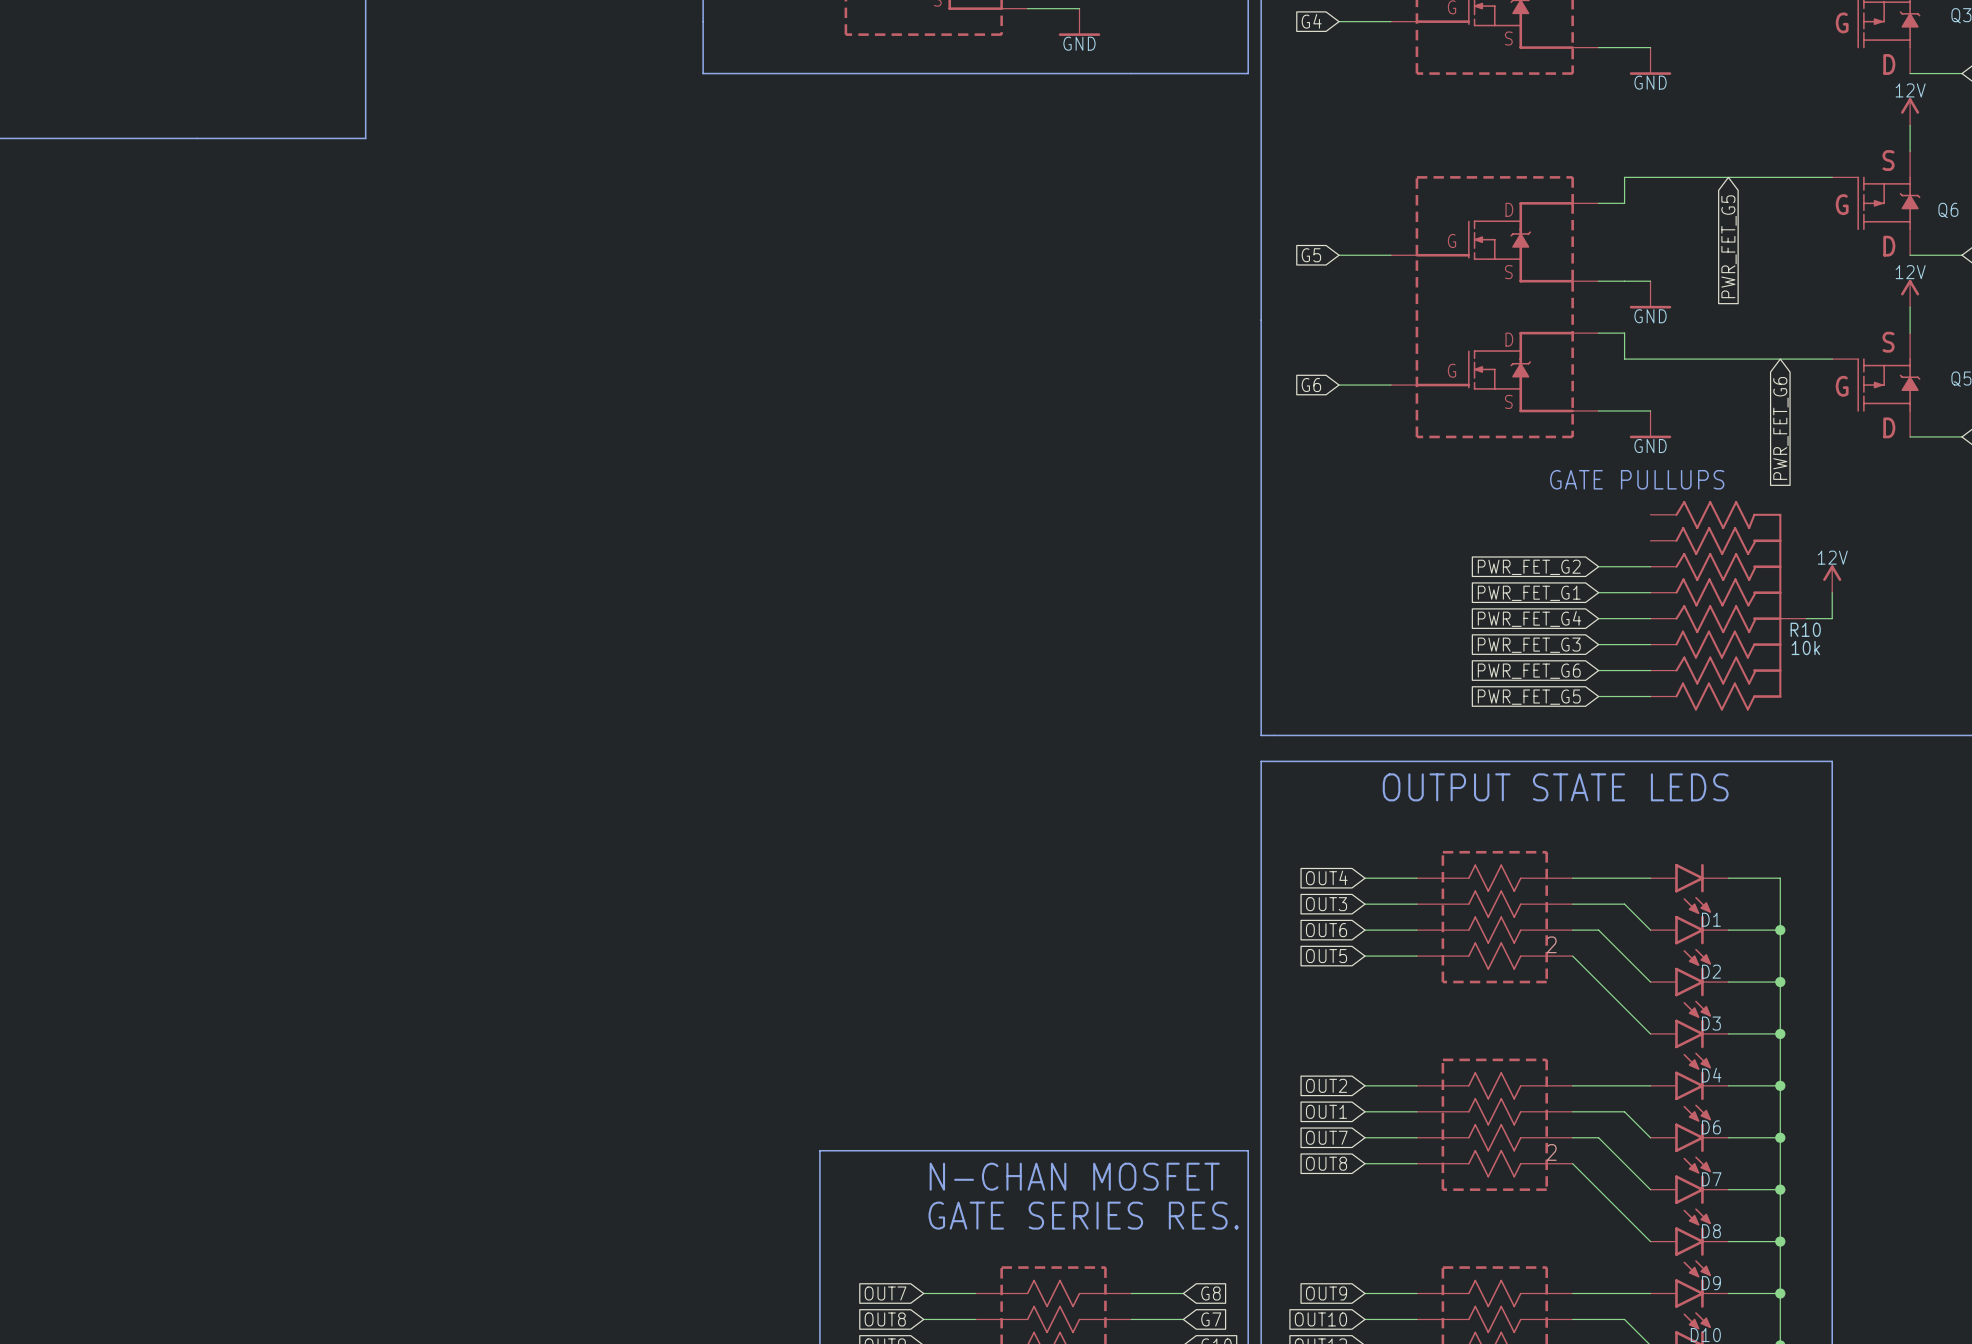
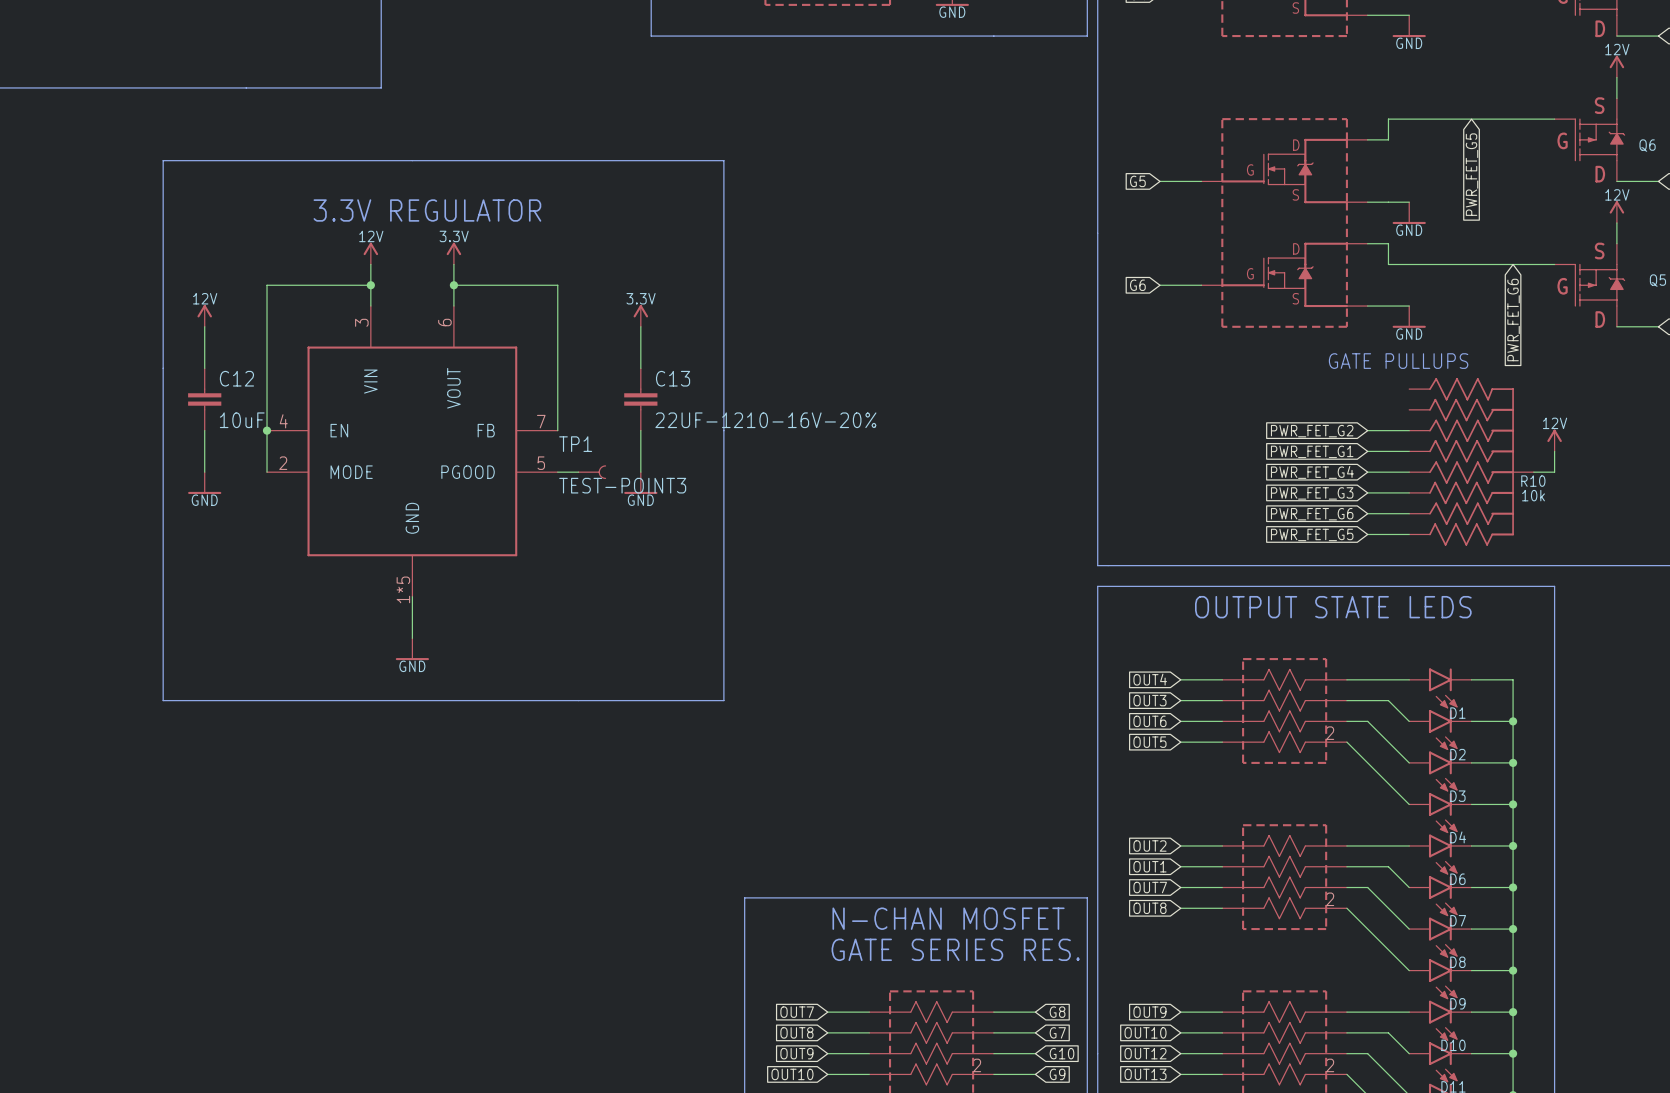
line: none -> (163, 160) (723, 160) (723, 700) (163, 700) (163, 160)
text: none -> 3.3V REGULATOR (427, 210)
power symbol: none -> 12V (370, 253)
power symbol: none -> 3.3V (453, 253)
wire: none -> (370, 264) (370, 306)
wire: none -> (453, 264) (453, 306)
wire: none -> (370, 285) (267, 285) (267, 472)
junction: none -> (370, 285)
wire: none -> (453, 285) (557, 285) (557, 430)
junction: none -> (453, 285)
power symbol: none -> 12V (204, 315)
power symbol: none -> 3.3V (640, 315)
wire: none -> (204, 326) (204, 368)
wire: none -> (640, 326) (640, 368)
C12: none -> 10uF (204, 399)
C13: none -> 22UF-1210-16V-20% (640, 399)
wire: none -> (204, 430) (204, 472)
junction: none -> (267, 430)
wire: none -> (640, 430) (640, 472)
part: none -> (412, 451)
wire: none -> (557, 472) (578, 472)
TP1: none -> TEST-POINT3 (592, 472)
power symbol: none -> GND (204, 483)
power symbol: none -> GND (640, 483)
wire: none -> (412, 596) (412, 638)
power symbol: none -> GND (412, 649)

